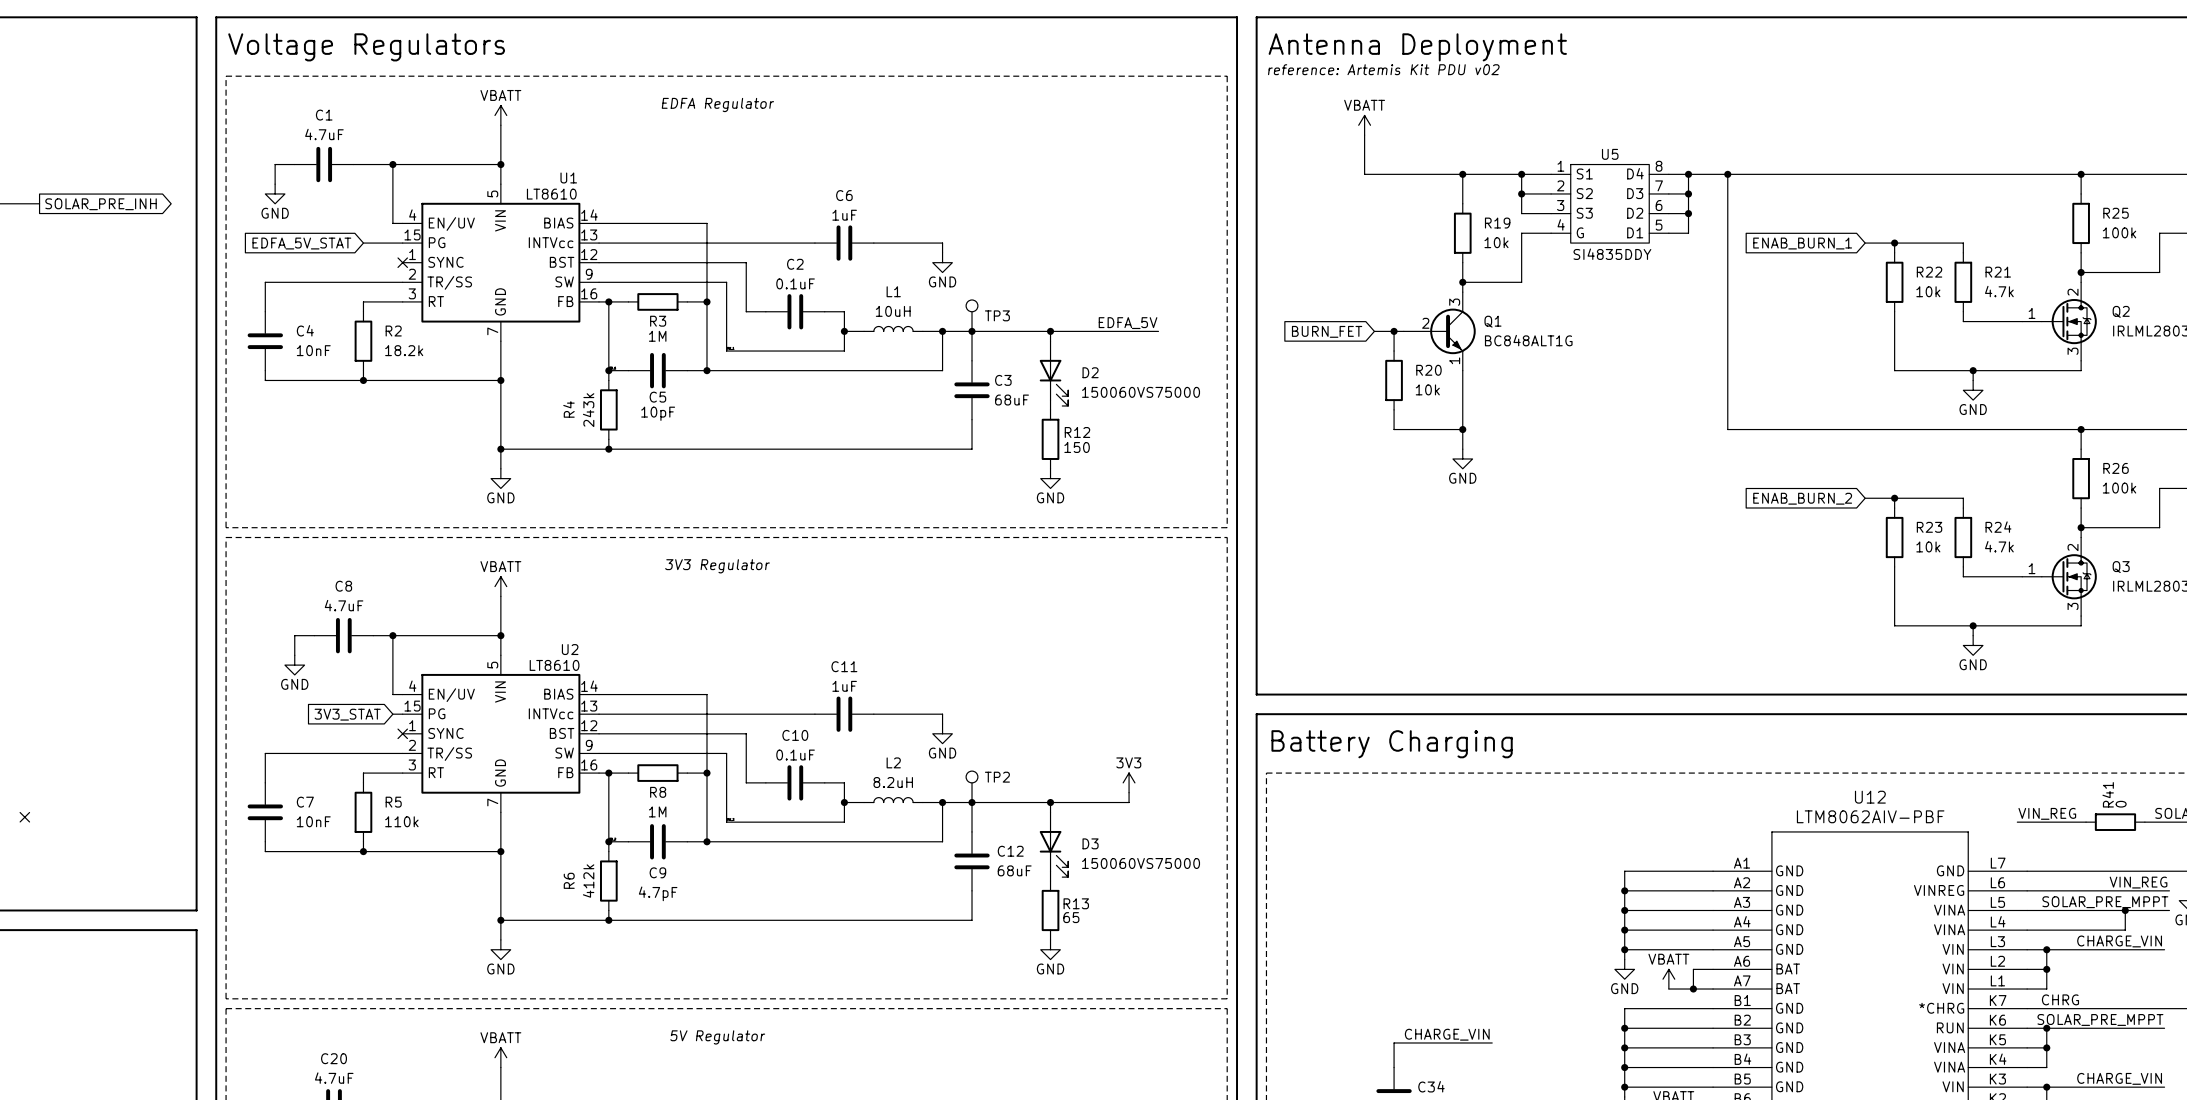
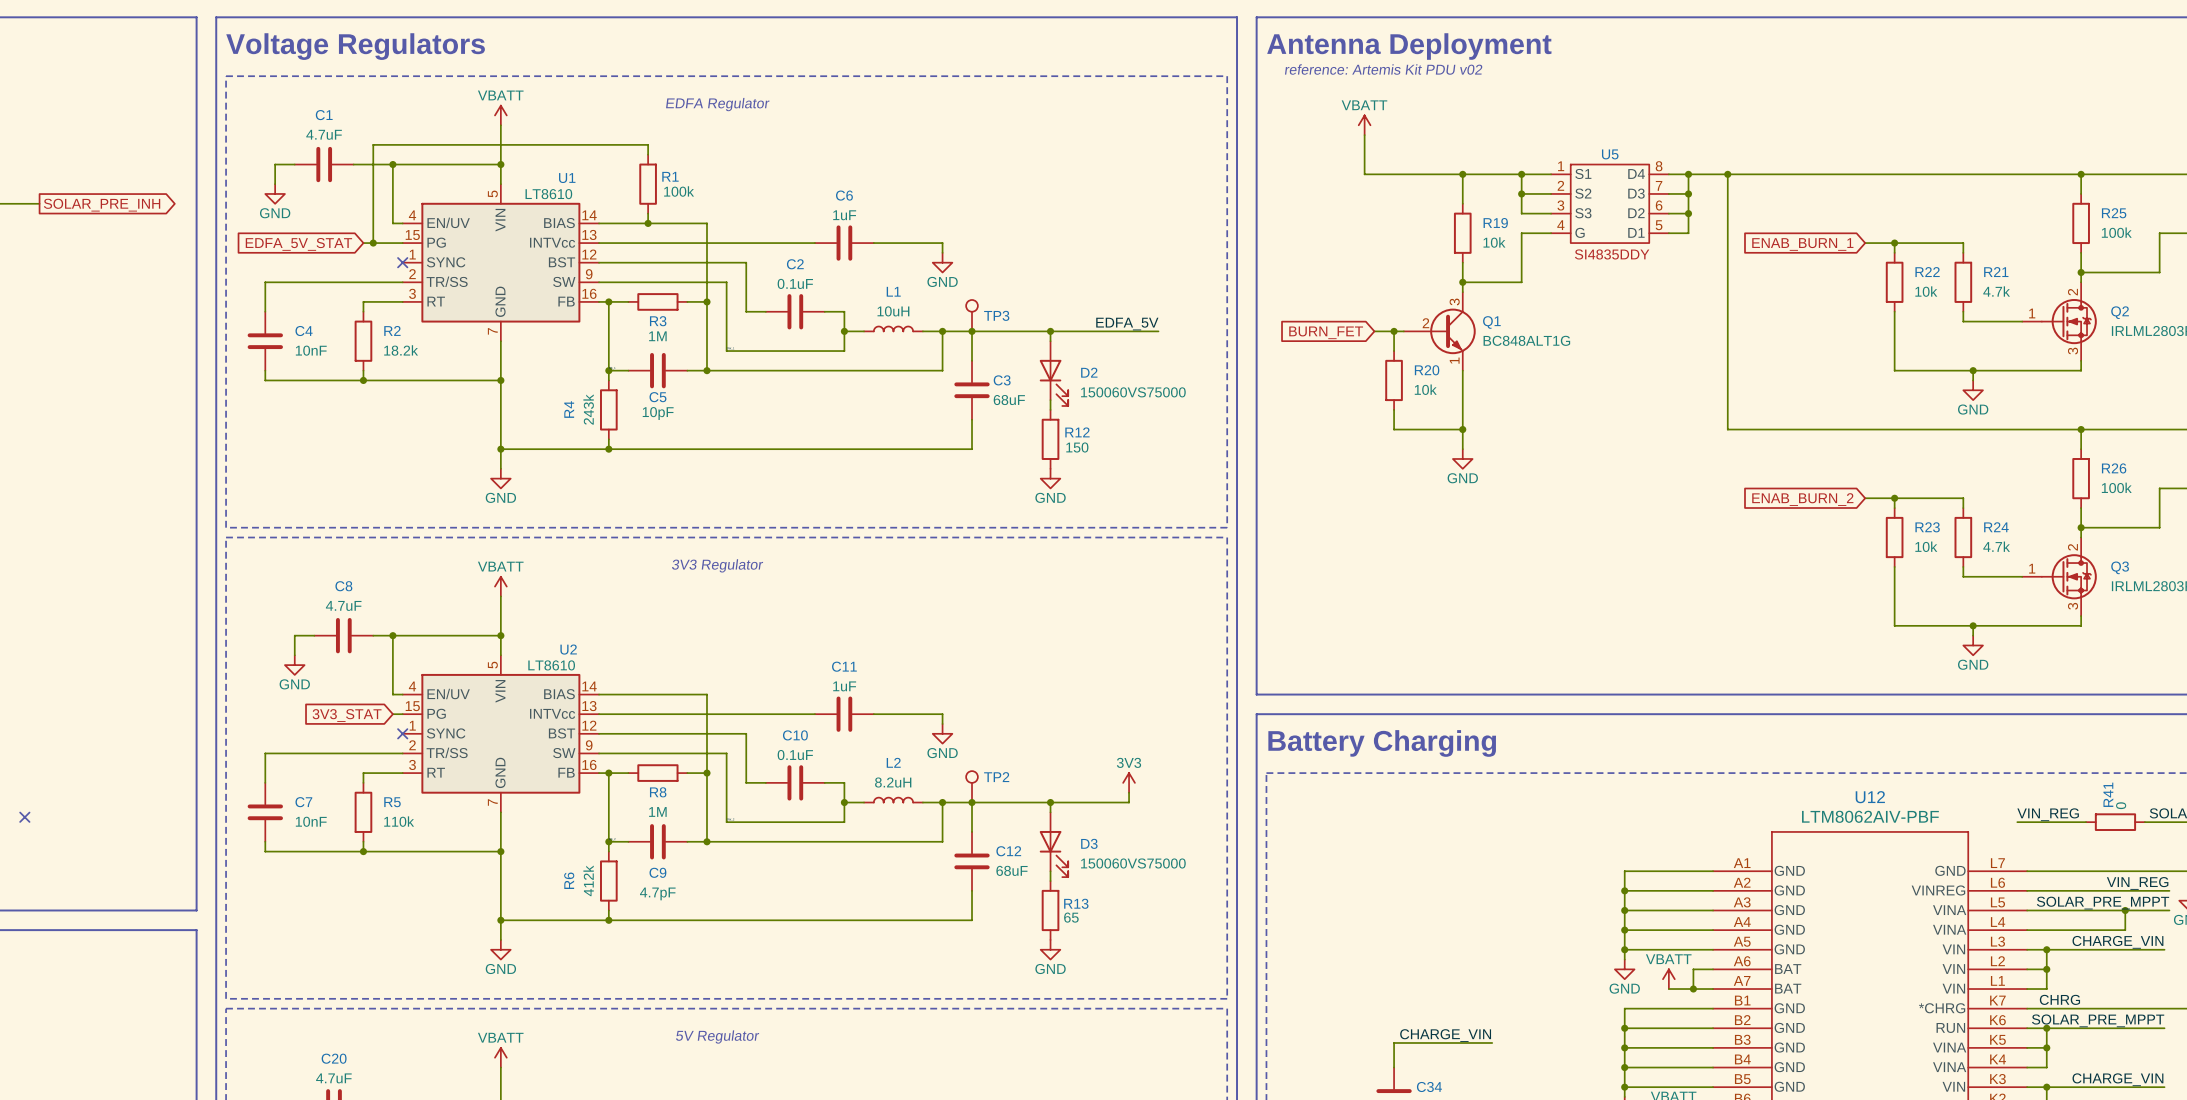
wire: none -> (648, 154) (648, 144) (373, 144) (373, 243)
R1: none -> 100k (648, 184)
wire: none -> (648, 213) (648, 223)
junction: none -> (648, 223)
junction: none -> (373, 243)

